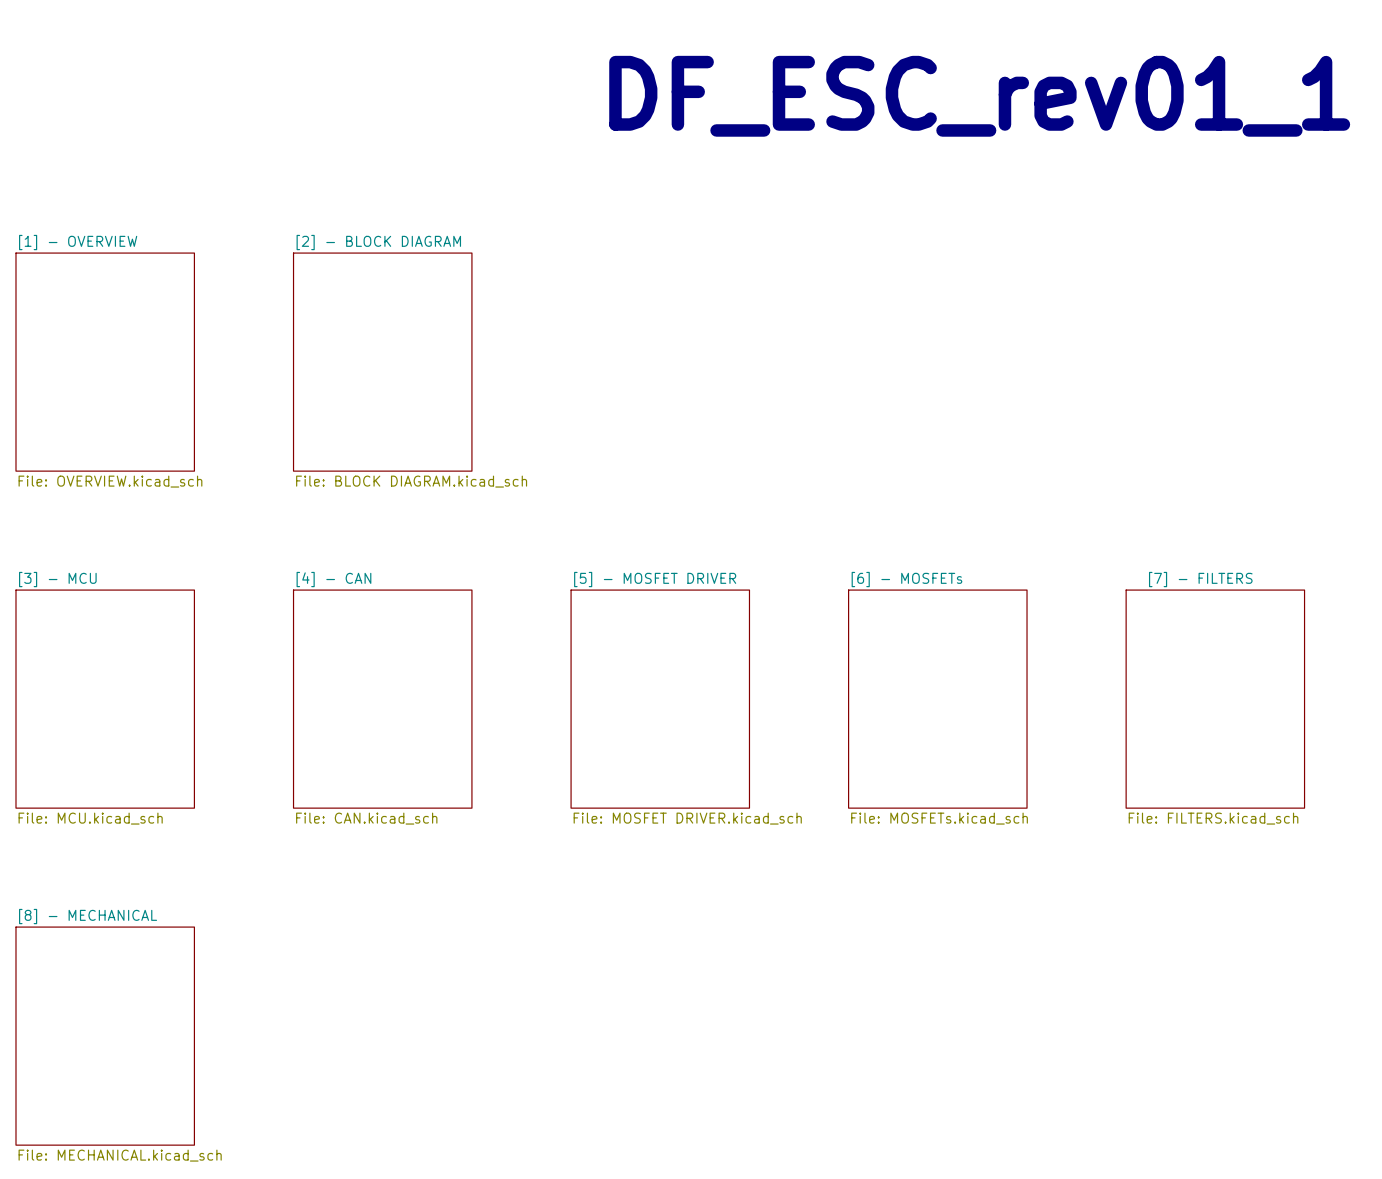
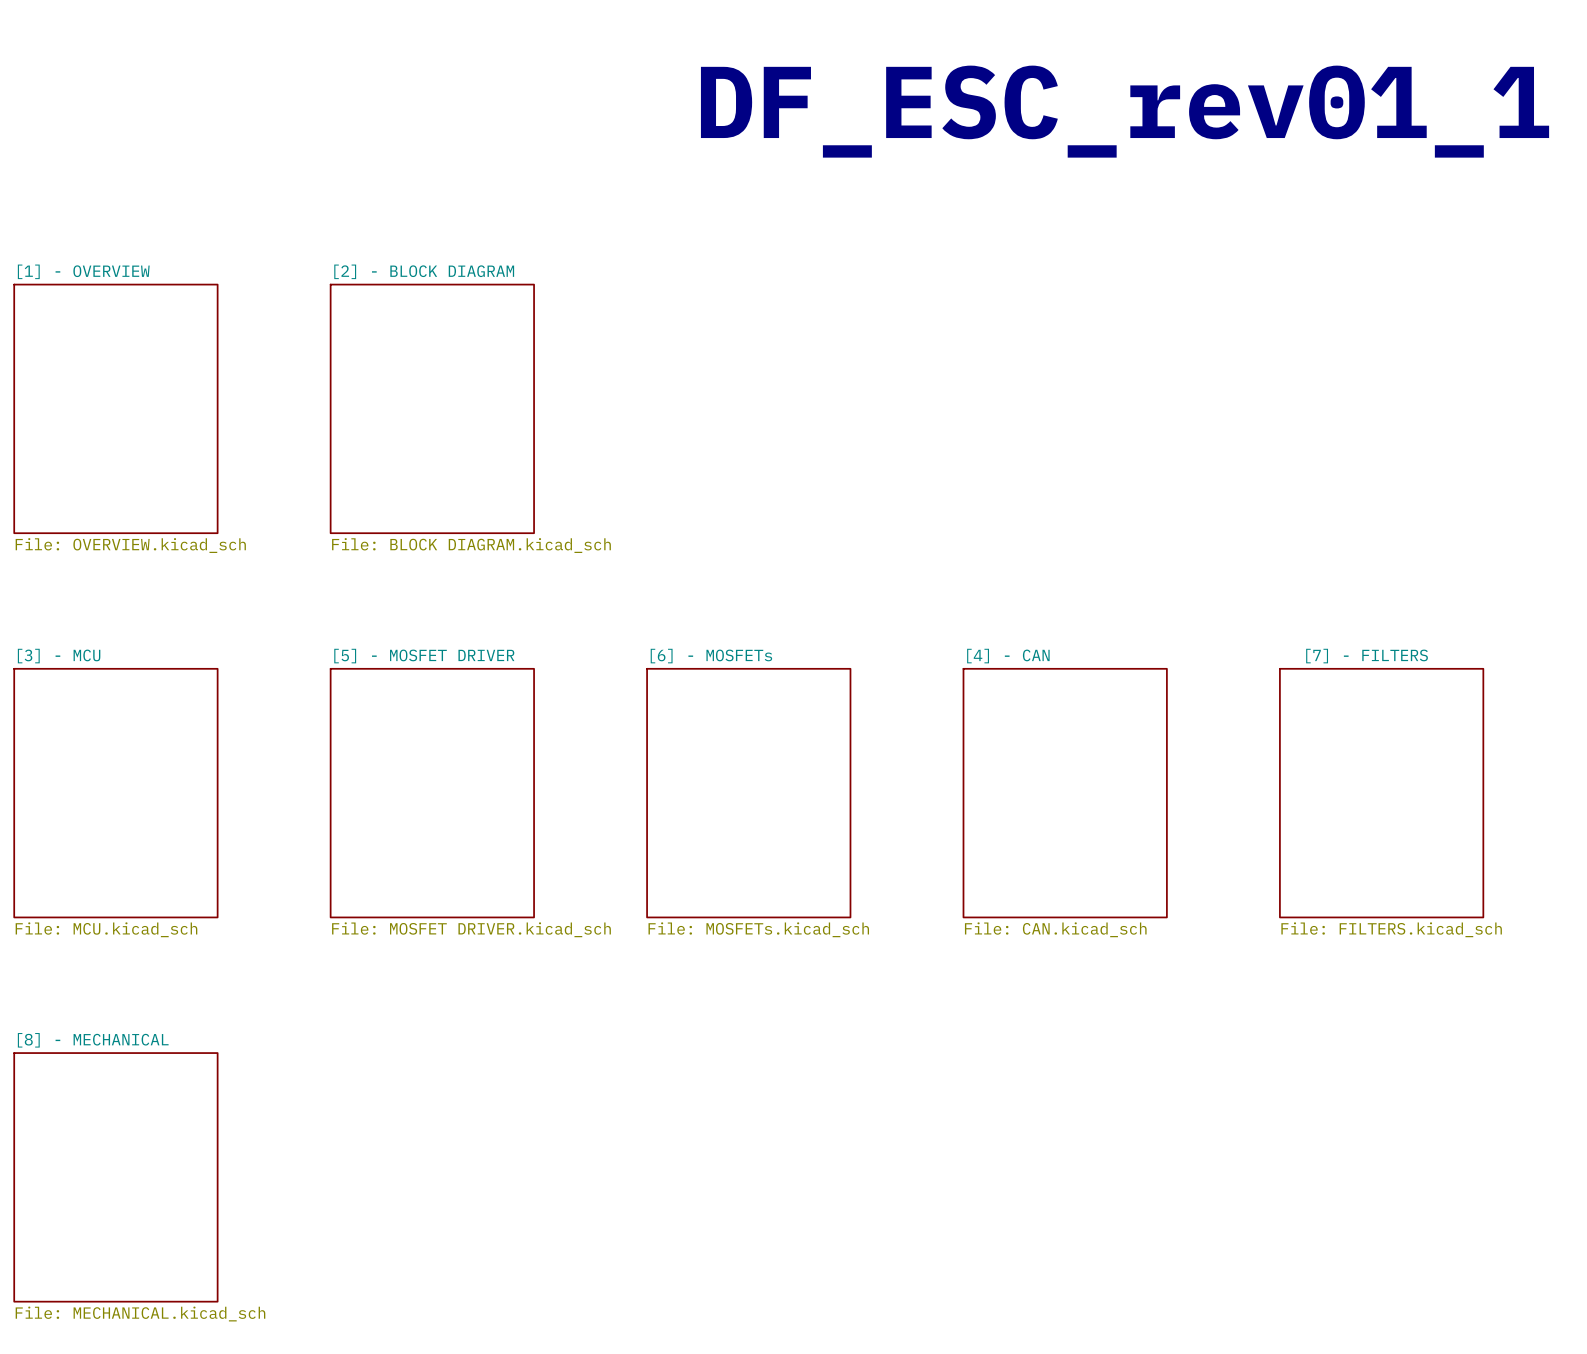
sheet [4] - CAN name: [4] - CAN (333, 579) -> [5] - MOSFET DRIVER (424, 656)
sheet [5] - MOSFET DRIVER name: [5] - MOSFET DRIVER (655, 579) -> [6] - MOSFETs (711, 656)
sheet [6] - MOSFETs name: [6] - MOSFETs (906, 579) -> [4] - CAN (1008, 656)
sheet [4] - CAN value: File: CAN.kicad_sch (366, 818) -> File: MOSFET DRIVER.kicad_sch (471, 929)
sheet [5] - MOSFET DRIVER value: File: MOSFET DRIVER.kicad_sch (687, 818) -> File: MOSFETs.kicad_sch (758, 929)
sheet [6] - MOSFETs value: File: MOSFETs.kicad_sch (939, 818) -> File: CAN.kicad_sch (1055, 929)

